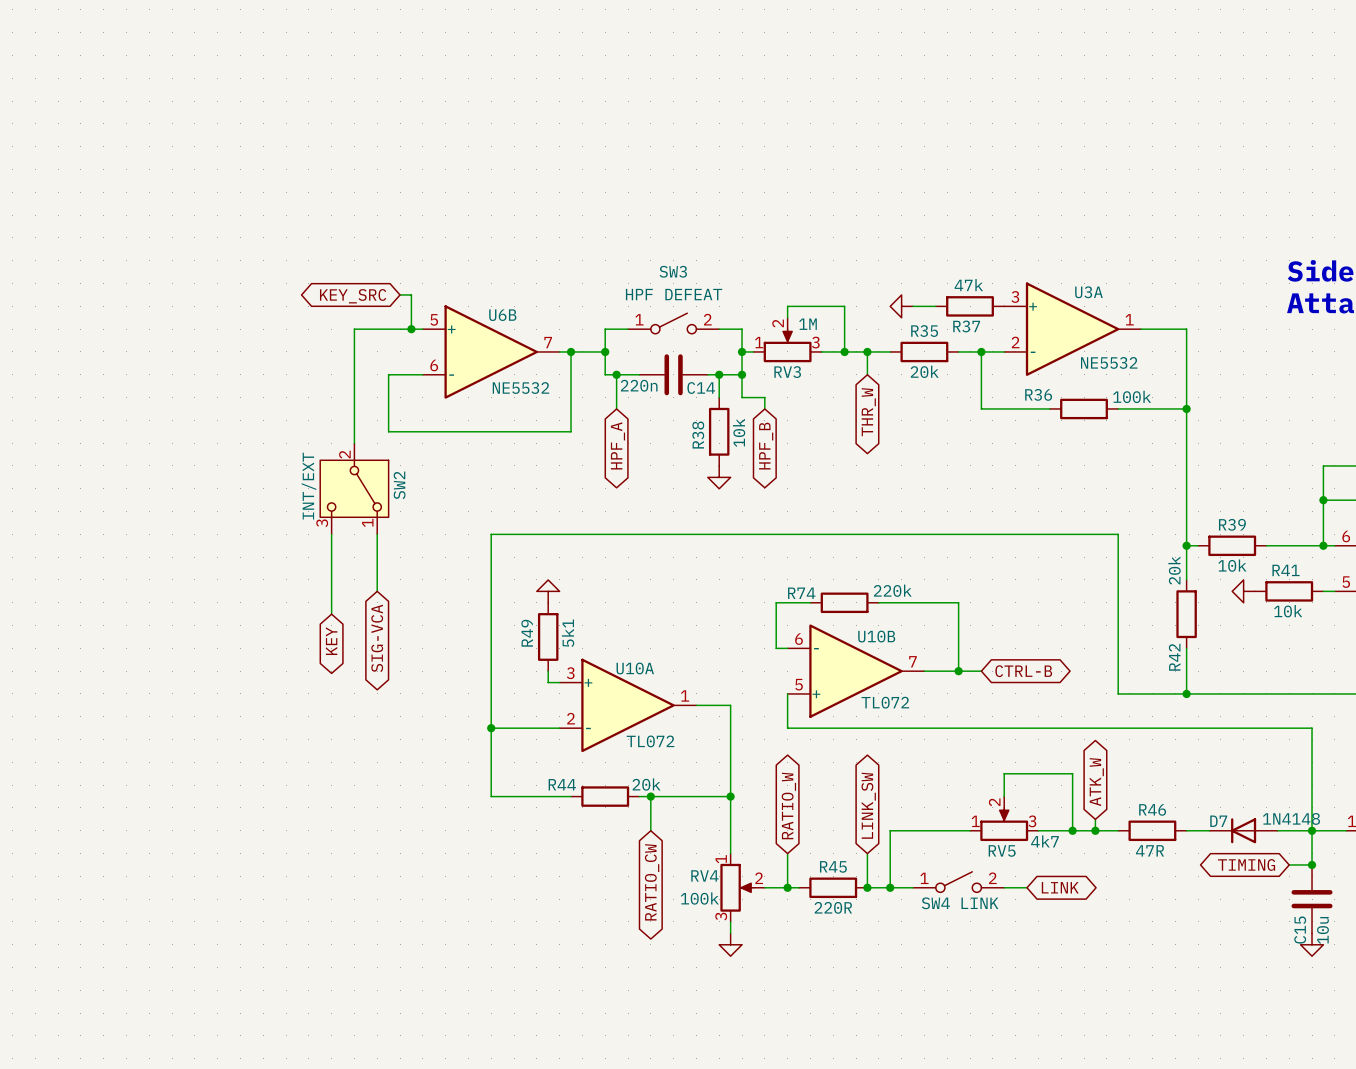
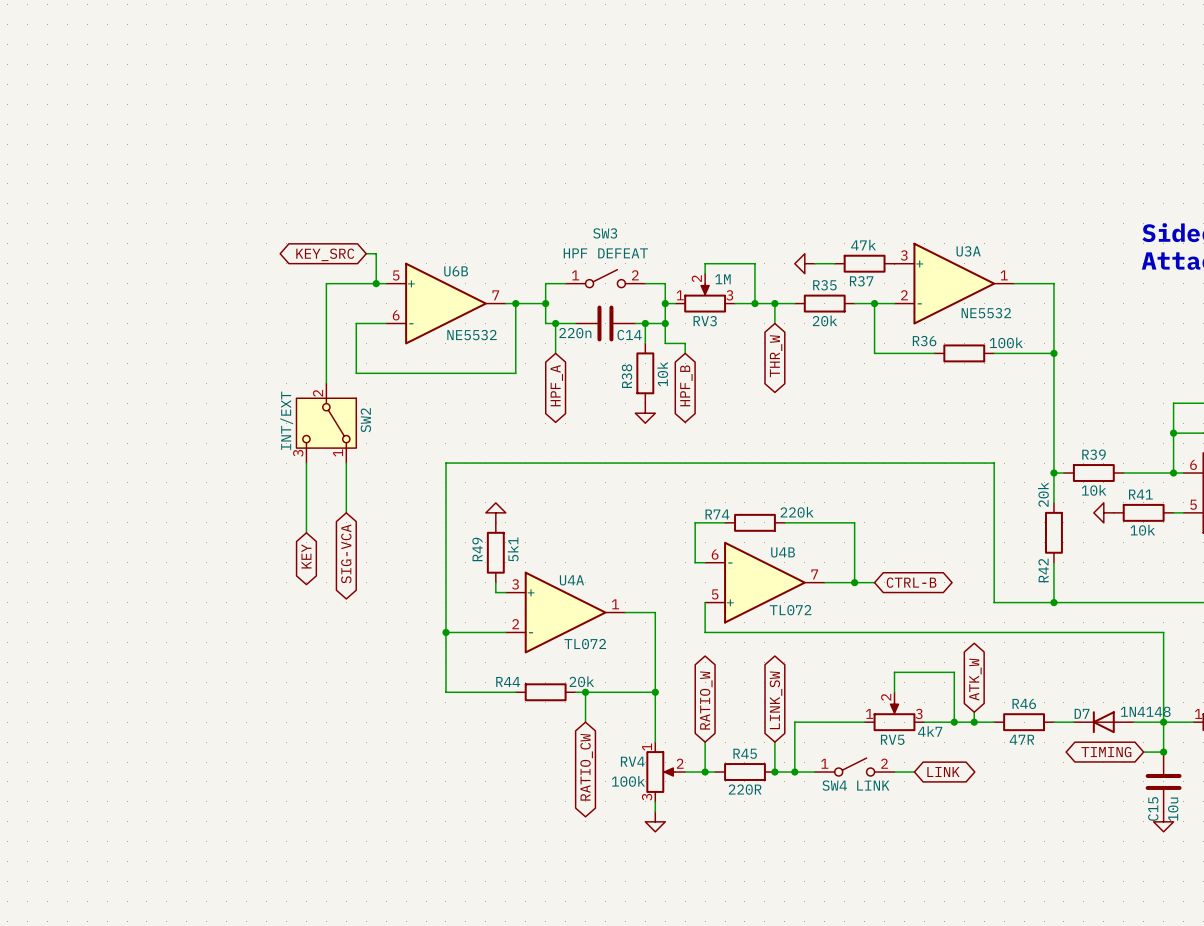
U10B name: U10B (876, 636) -> U4B (783, 552)
U10A name: U10A (635, 668) -> U4A (571, 580)

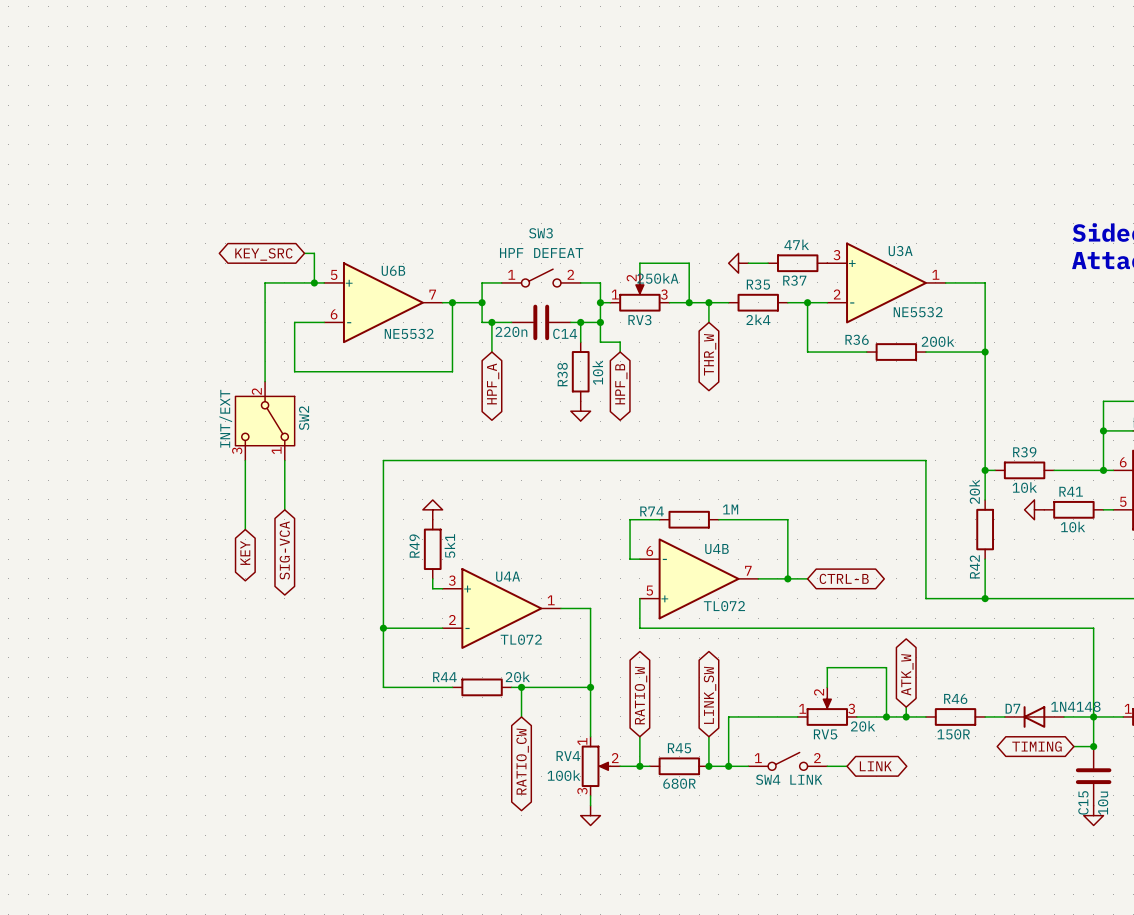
RV3 value: 1M (722, 279) -> 250kA (657, 278)
R35 value: 20k (825, 320) -> 2k4 (758, 319)
R36 value: 100k (1006, 342) -> 200k (938, 341)
R74 value: 220k (797, 512) -> 1M (730, 509)
RV5 value: 4k7 (930, 731) -> 20k (863, 726)
R46 value: 47R (1021, 739) -> 150R (953, 734)
R45 value: 220R (745, 789) -> 680R (679, 783)

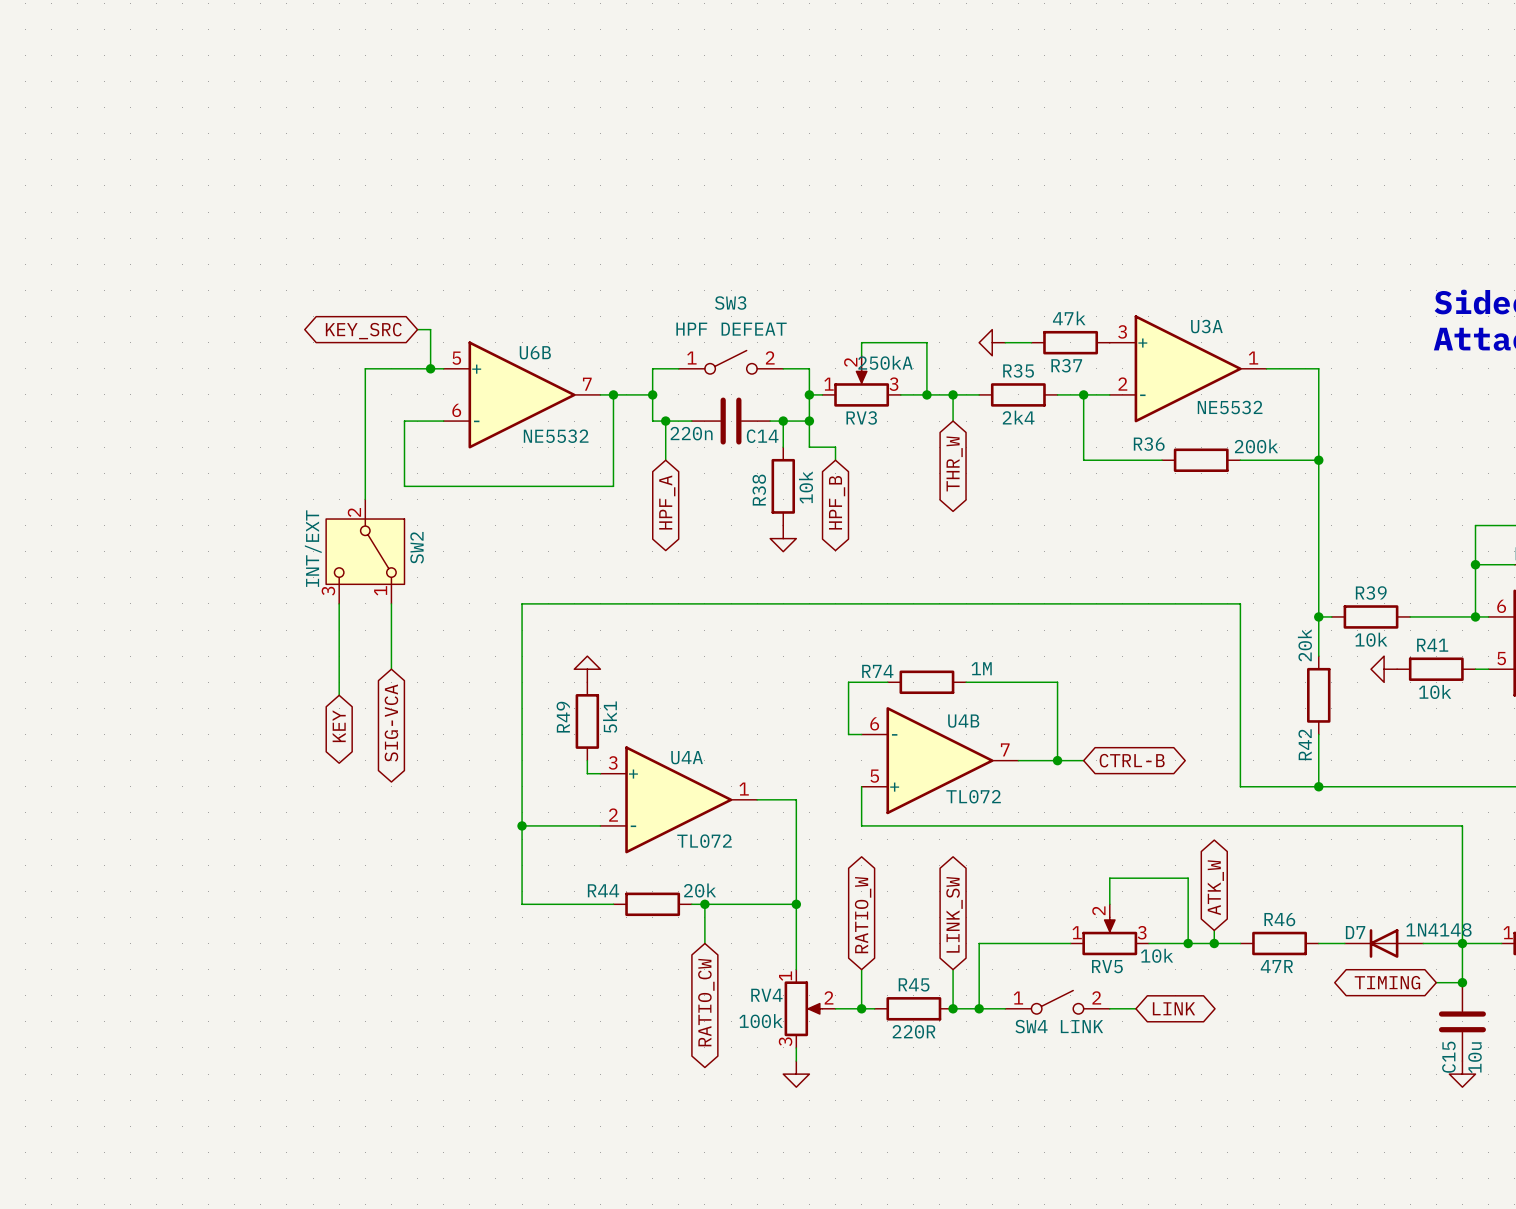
RV5 value: 20k (863, 726) -> 10k (1157, 955)
R46 value: 150R (953, 734) -> 47R (1276, 966)
R45 value: 680R (679, 783) -> 220R (914, 1031)

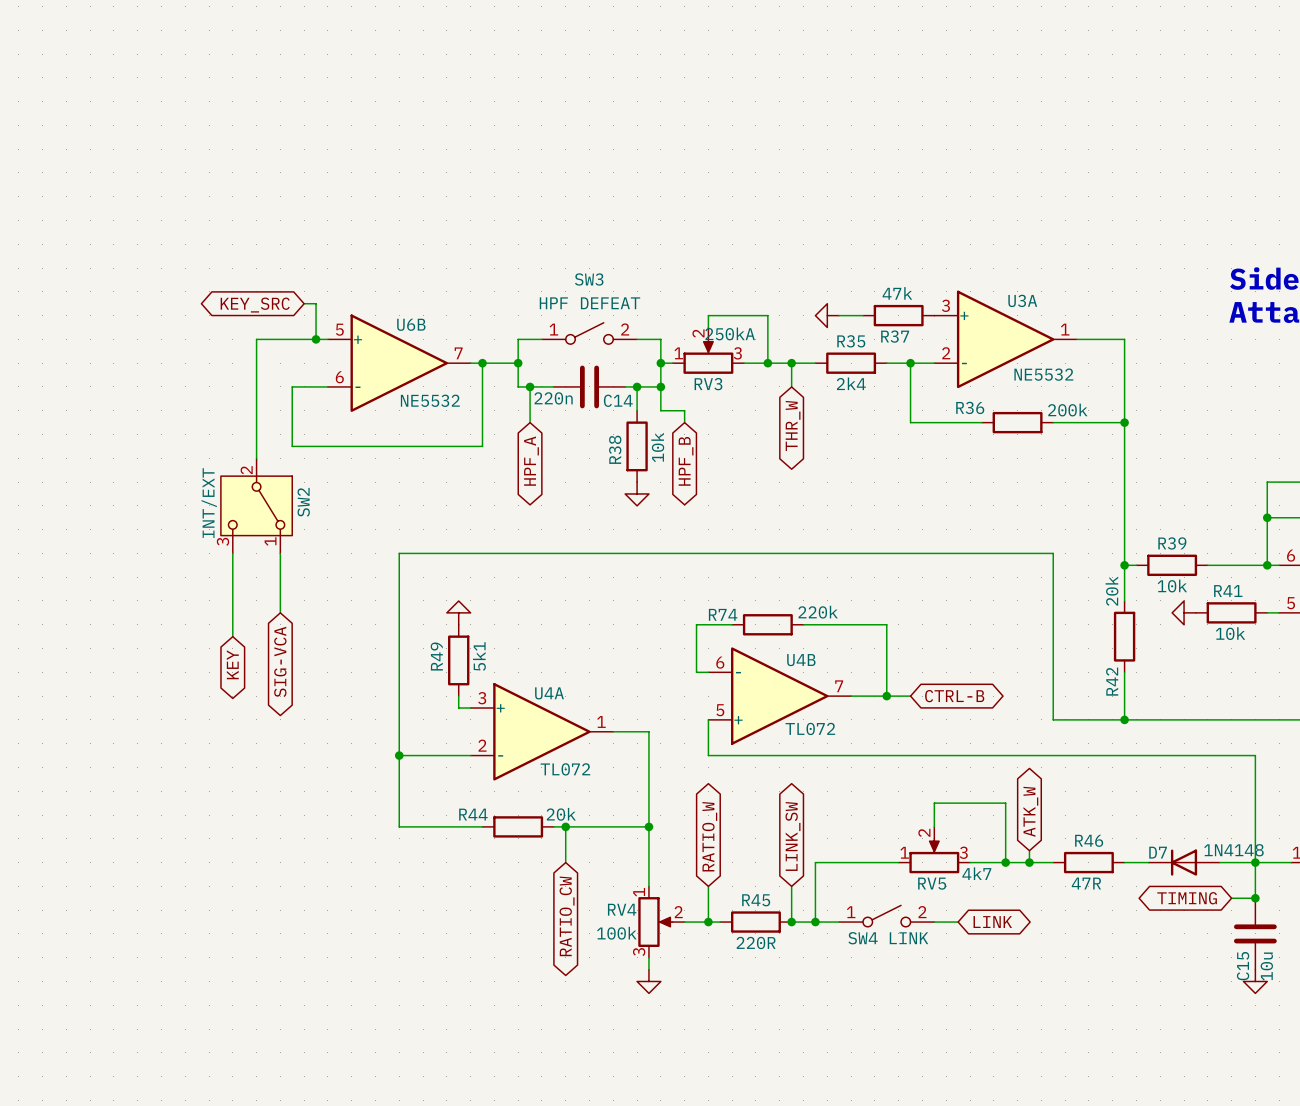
R74 value: 1M (981, 668) -> 220k (818, 612)
RV5 value: 10k (1157, 955) -> 4k7 (976, 873)

